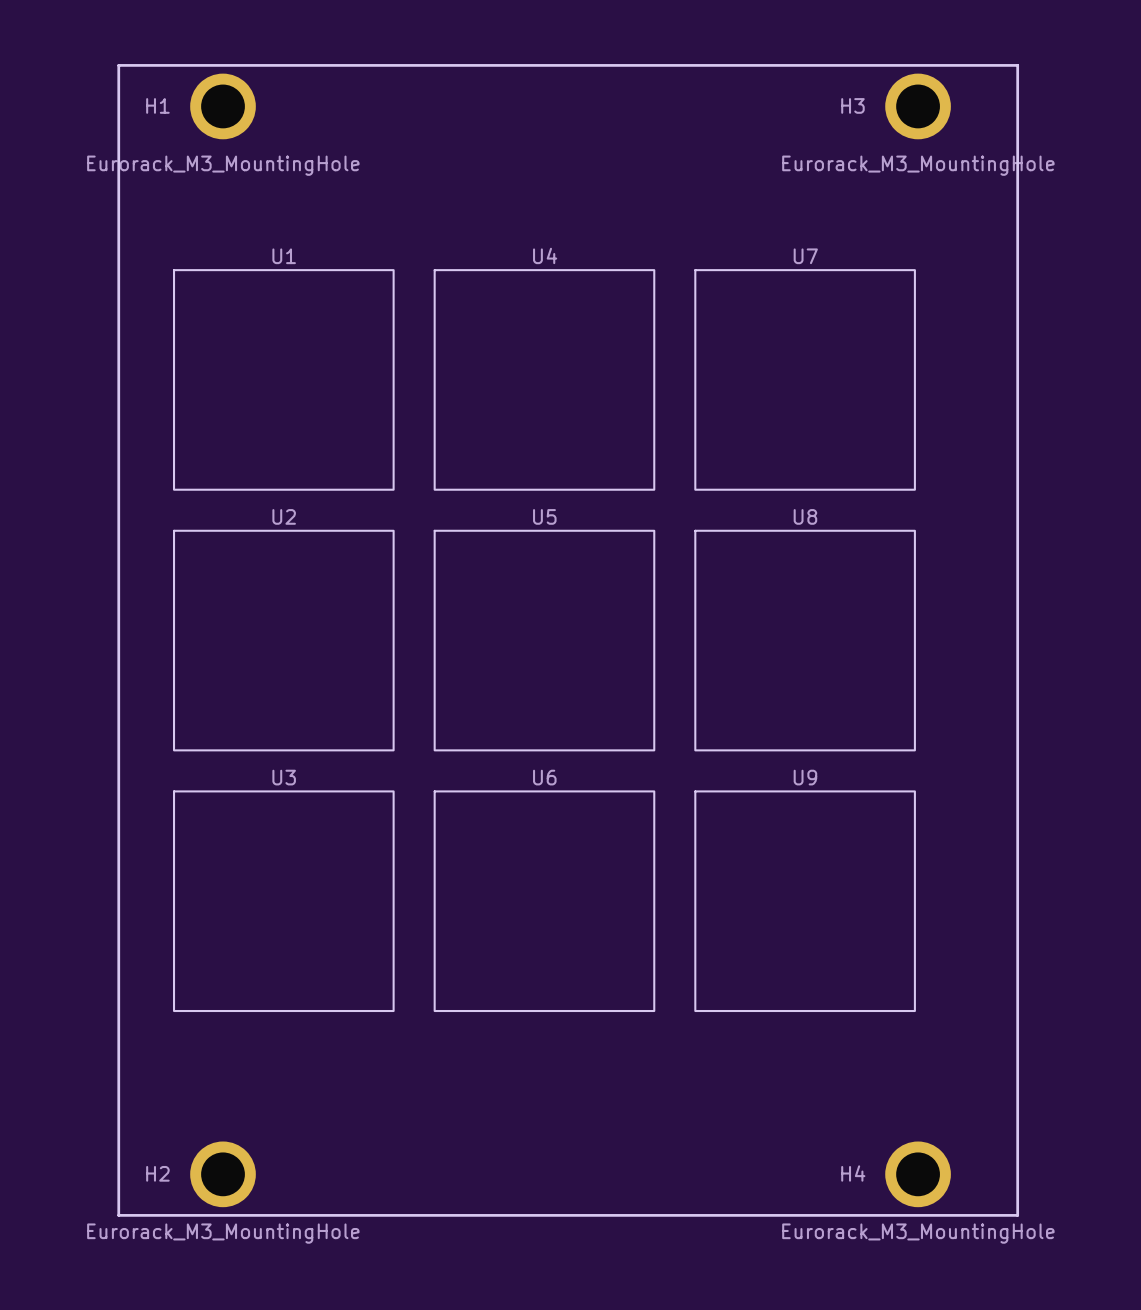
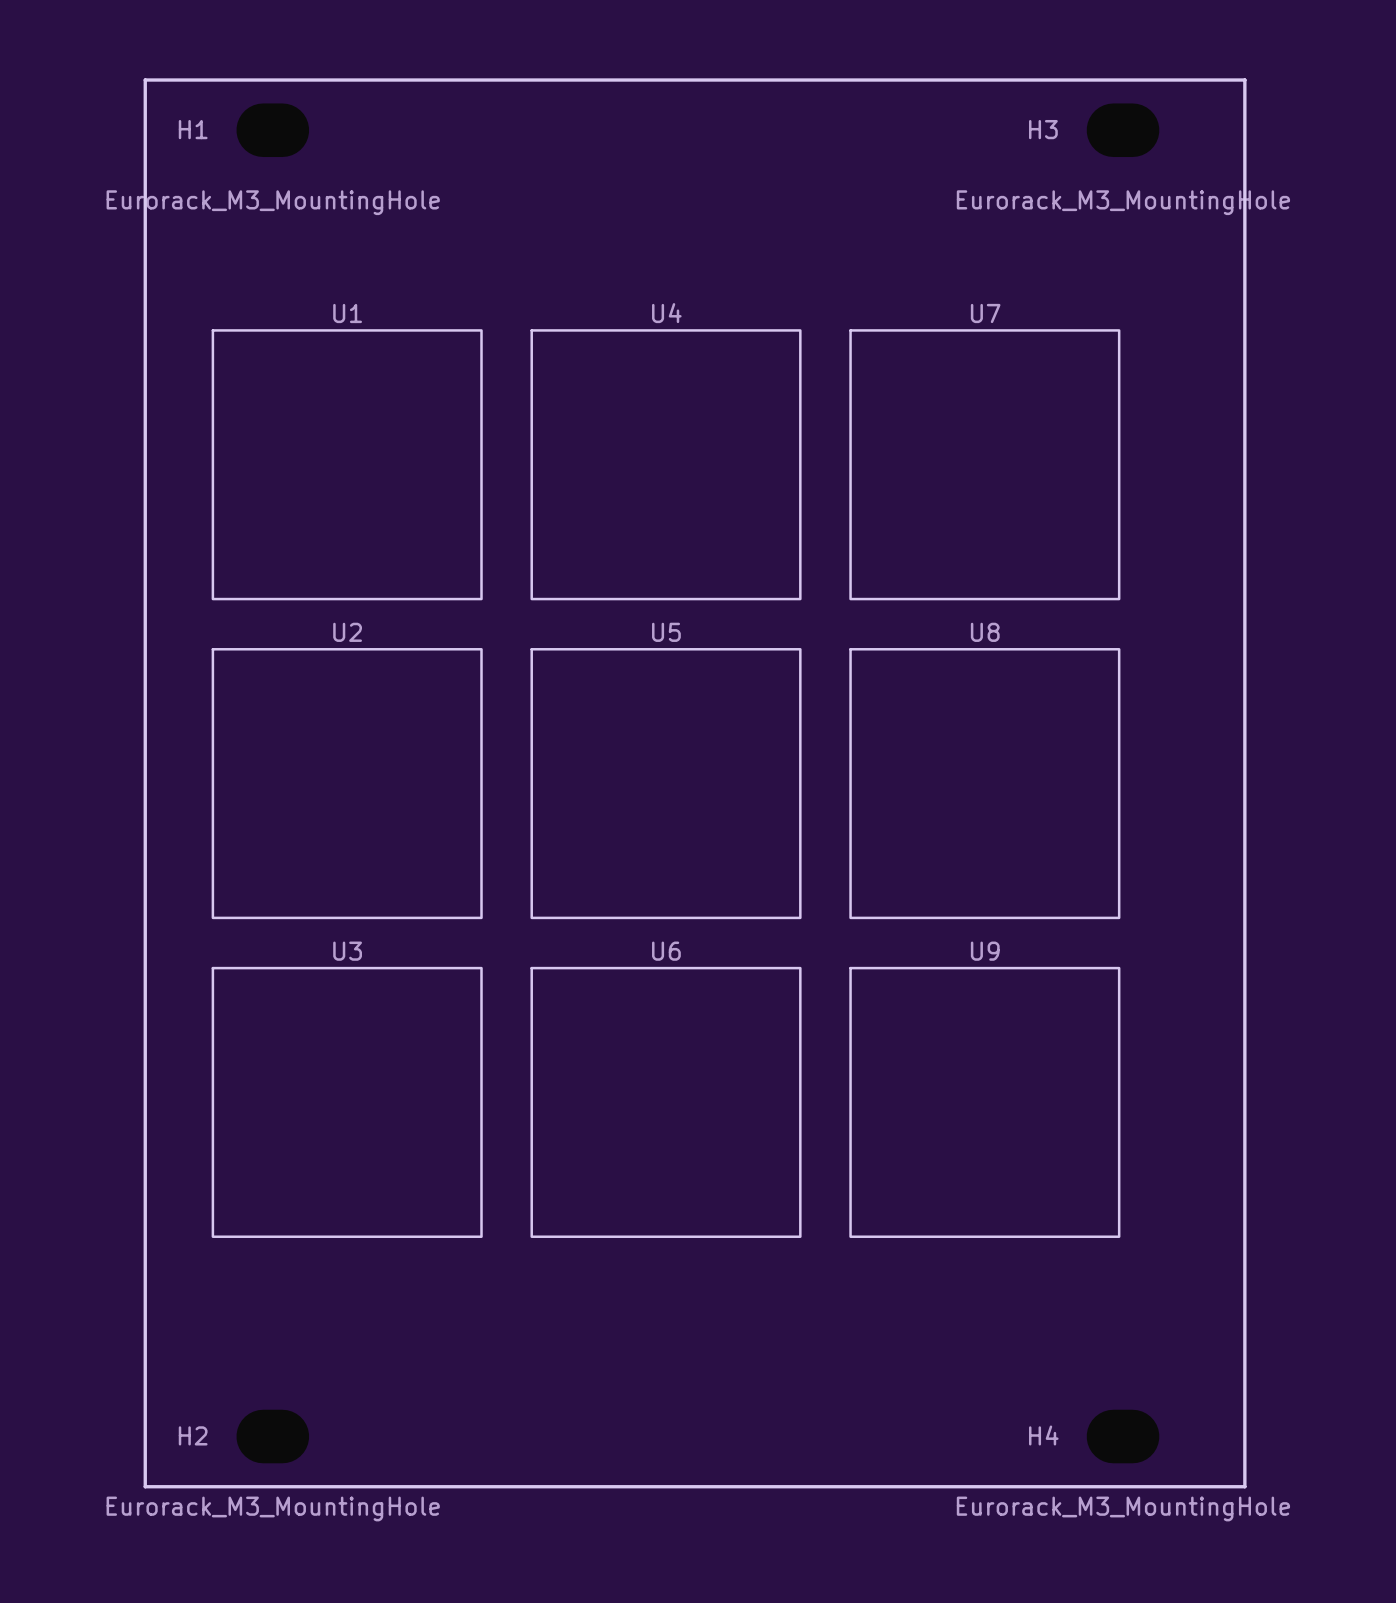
H1 footprint: [190, 73, 256, 140] -> [236, 103, 310, 158]
H3 footprint: [885, 73, 951, 140] -> [1086, 103, 1160, 158]
H2 footprint: [190, 1141, 256, 1208] -> [236, 1409, 310, 1464]
H4 footprint: [885, 1141, 951, 1208] -> [1086, 1409, 1160, 1464]

